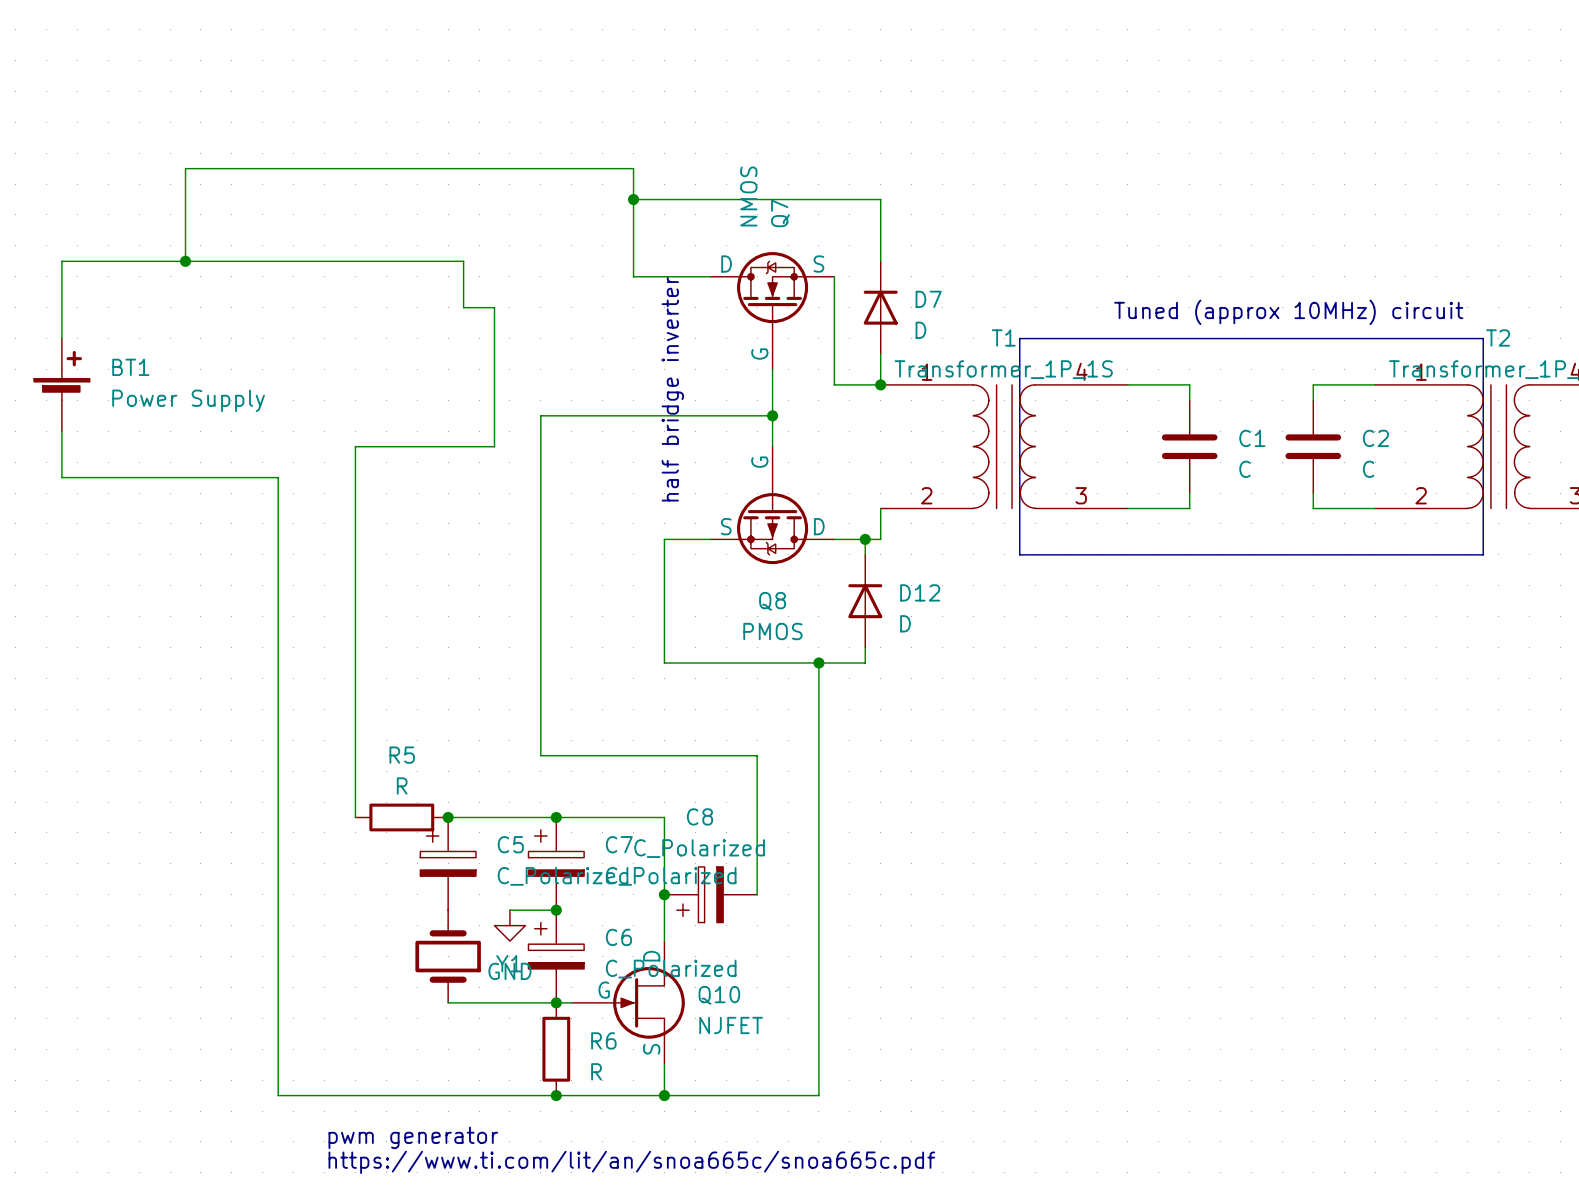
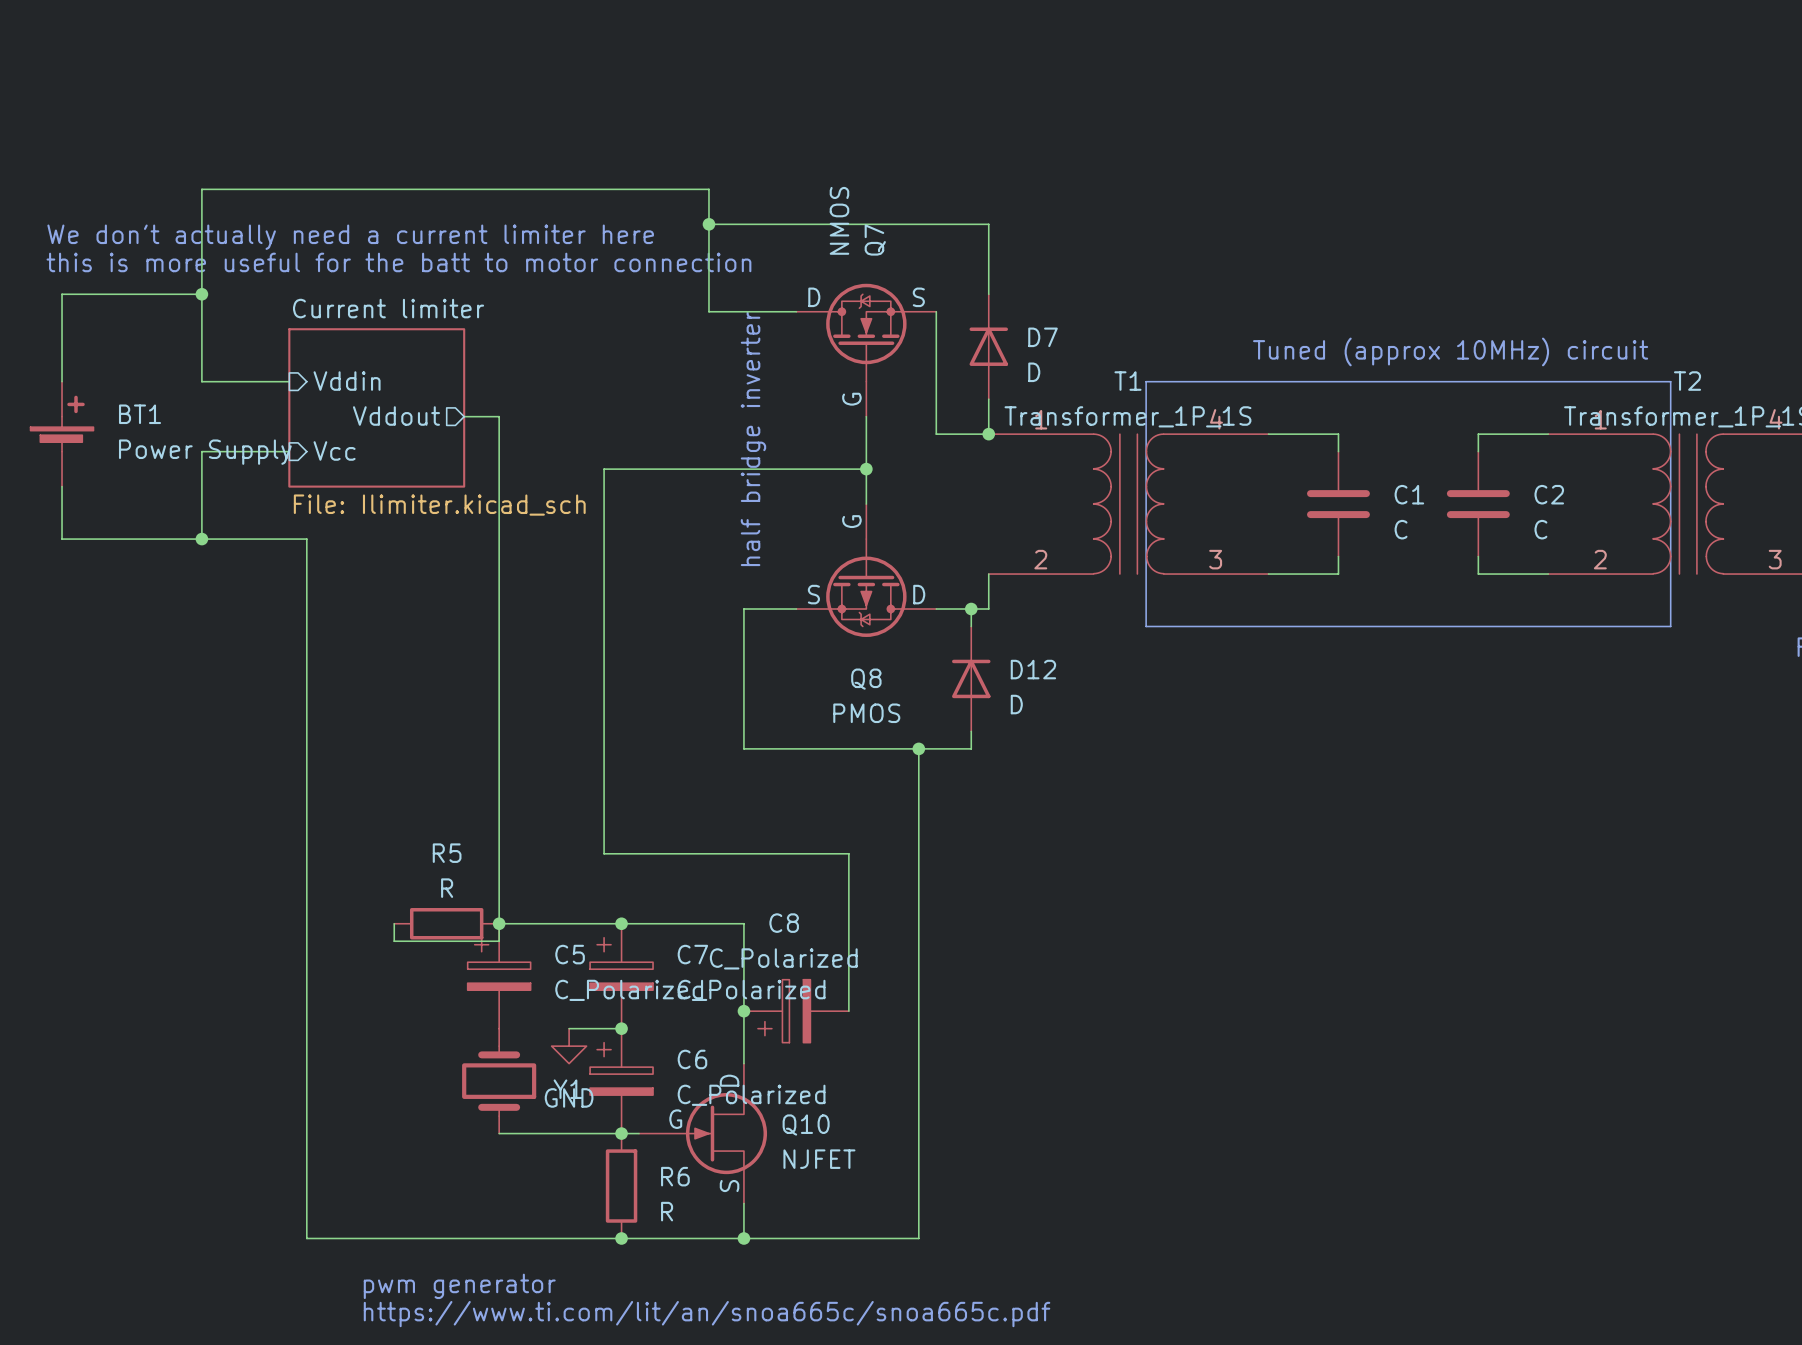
text: none -> We don't actually need a current limiter here (350, 237)
text: none -> this is more useful for the batt to motor connection (398, 262)
wire: (185, 261) (463, 261) (463, 307) (494, 307) (494, 446) (355, 446) (355, 817) -> (464, 416) (499, 416) (499, 941) (394, 941) (394, 923)
wire: none -> (201, 294) (201, 381) (289, 381)
sheet pin: none -> Vddin (347, 381)
sheet Current limiter: none -> File: Ilimiter.kicad_sch (376, 407)
sheet pin: none -> Vddout (396, 416)
sheet pin: none -> Vcc (334, 450)
wire: none -> (289, 451) (201, 451) (201, 539)
junction: none -> (201, 539)

